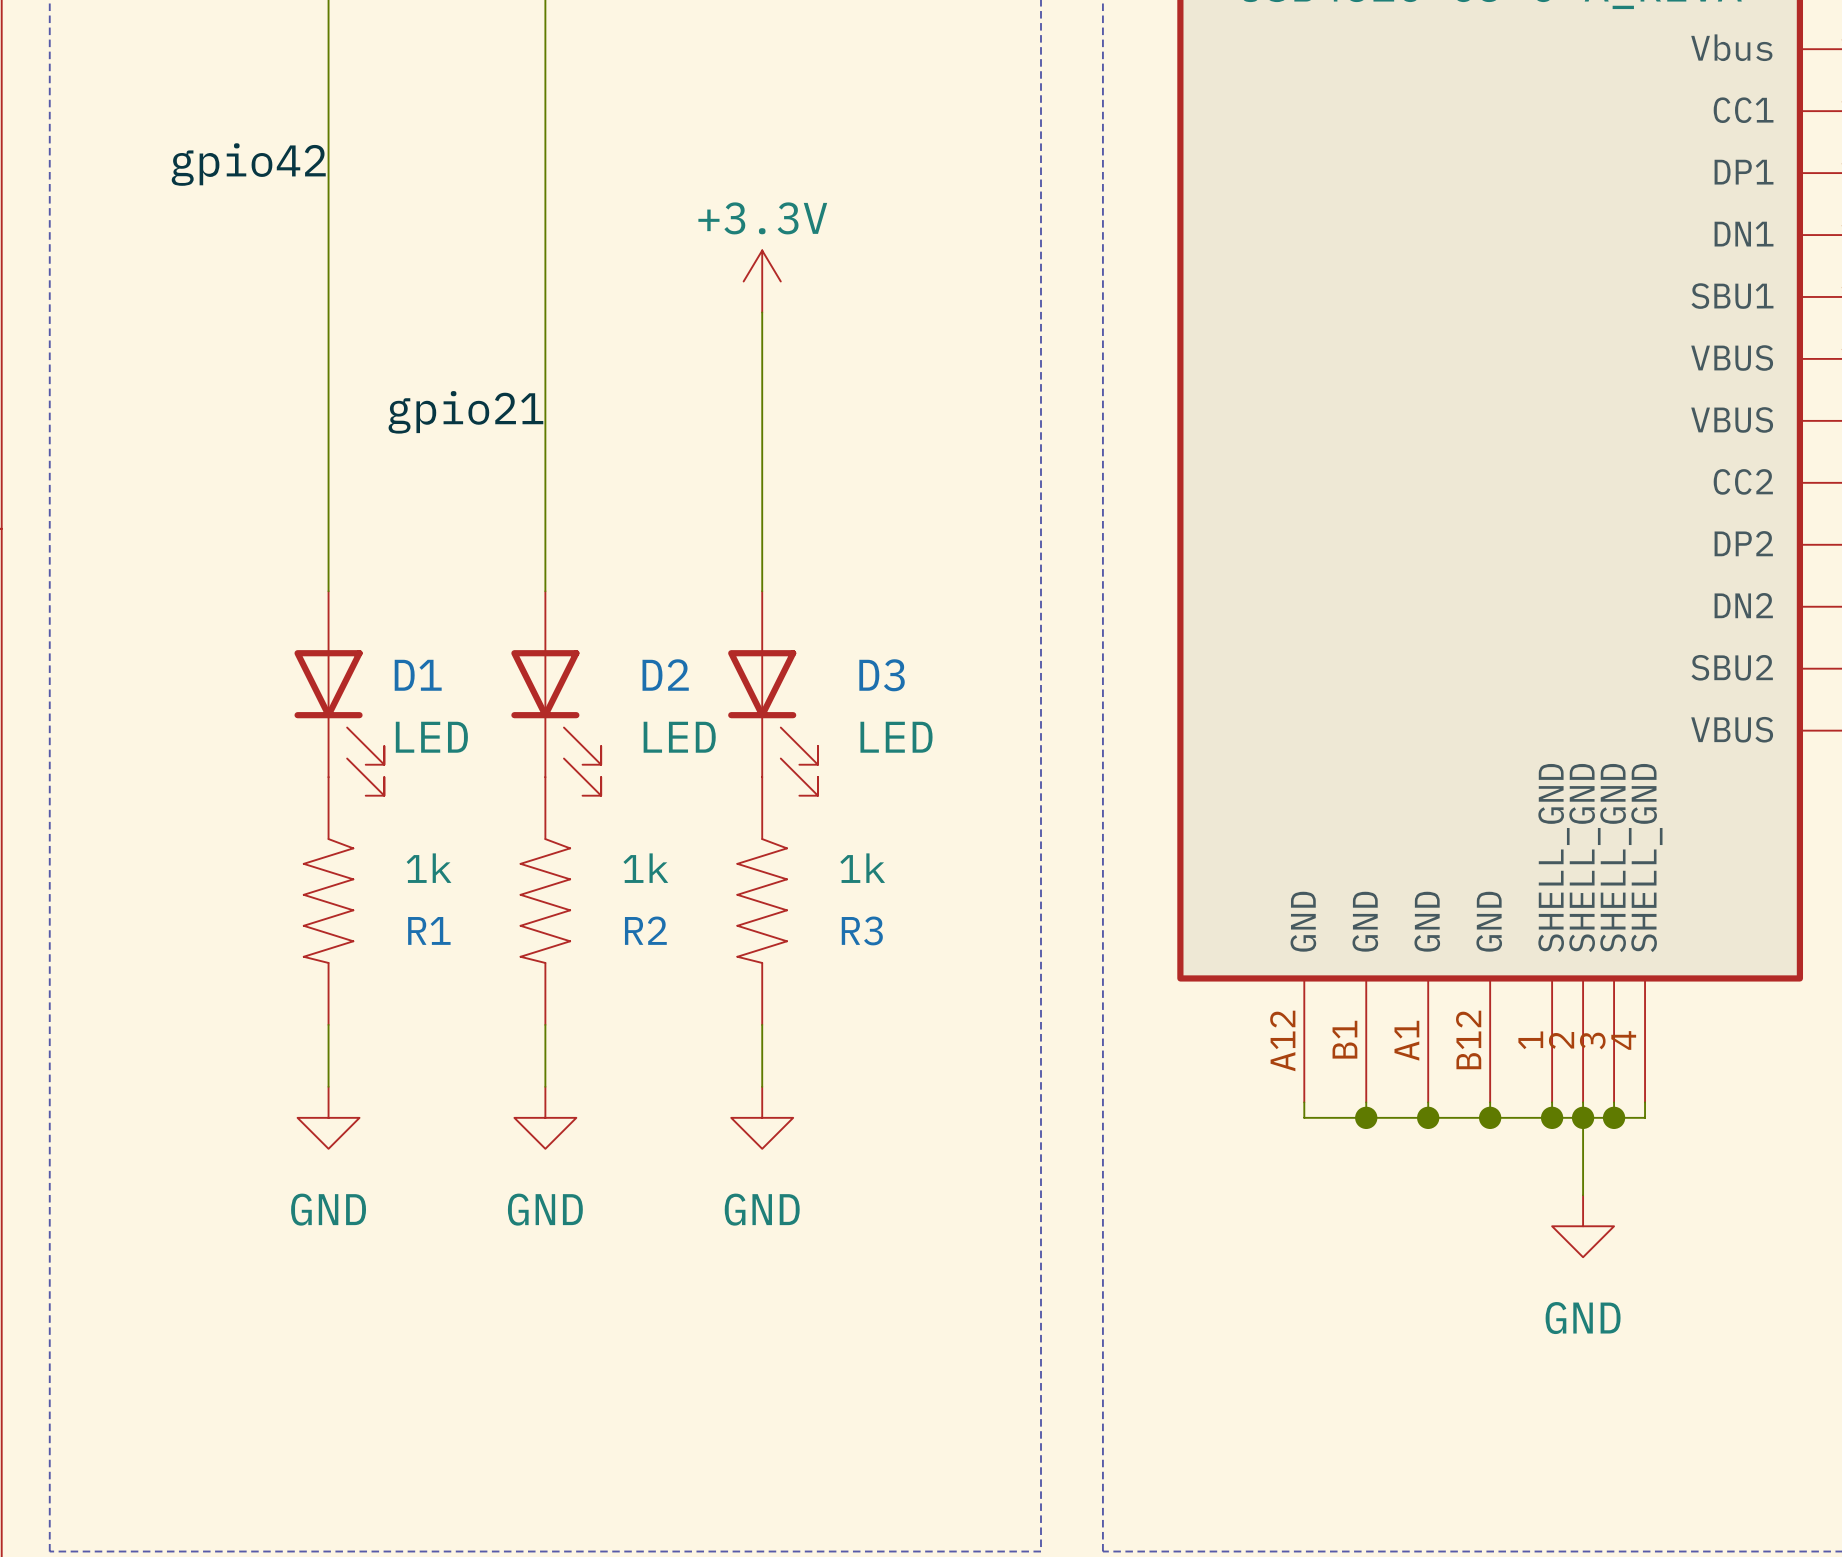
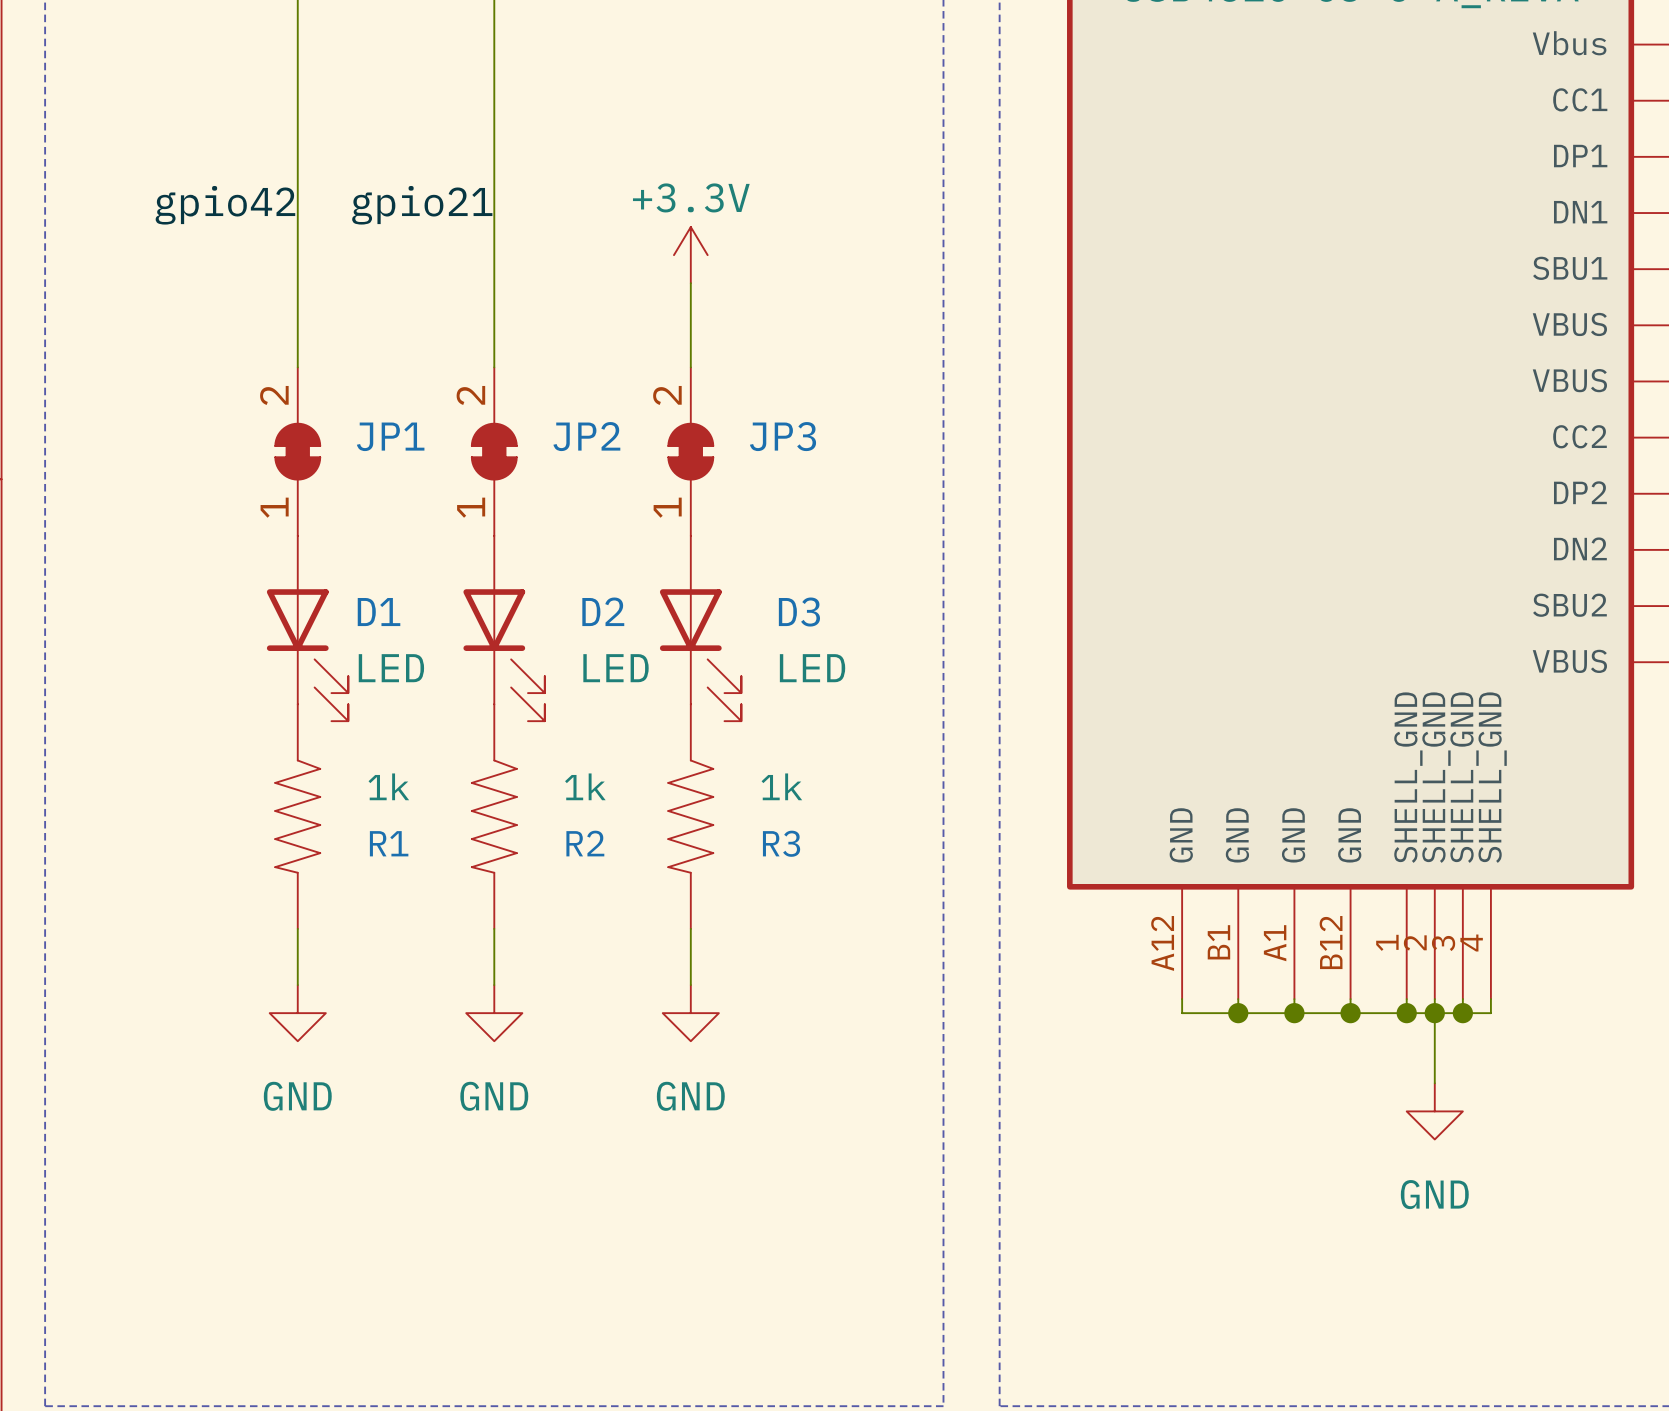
label position: gpio42 (248, 164) -> gpio42 (225, 205)
label position: gpio21 (465, 412) -> gpio21 (422, 205)
JP1: none -> (297, 451)
JP2: none -> (494, 451)
JP3: none -> (690, 451)

